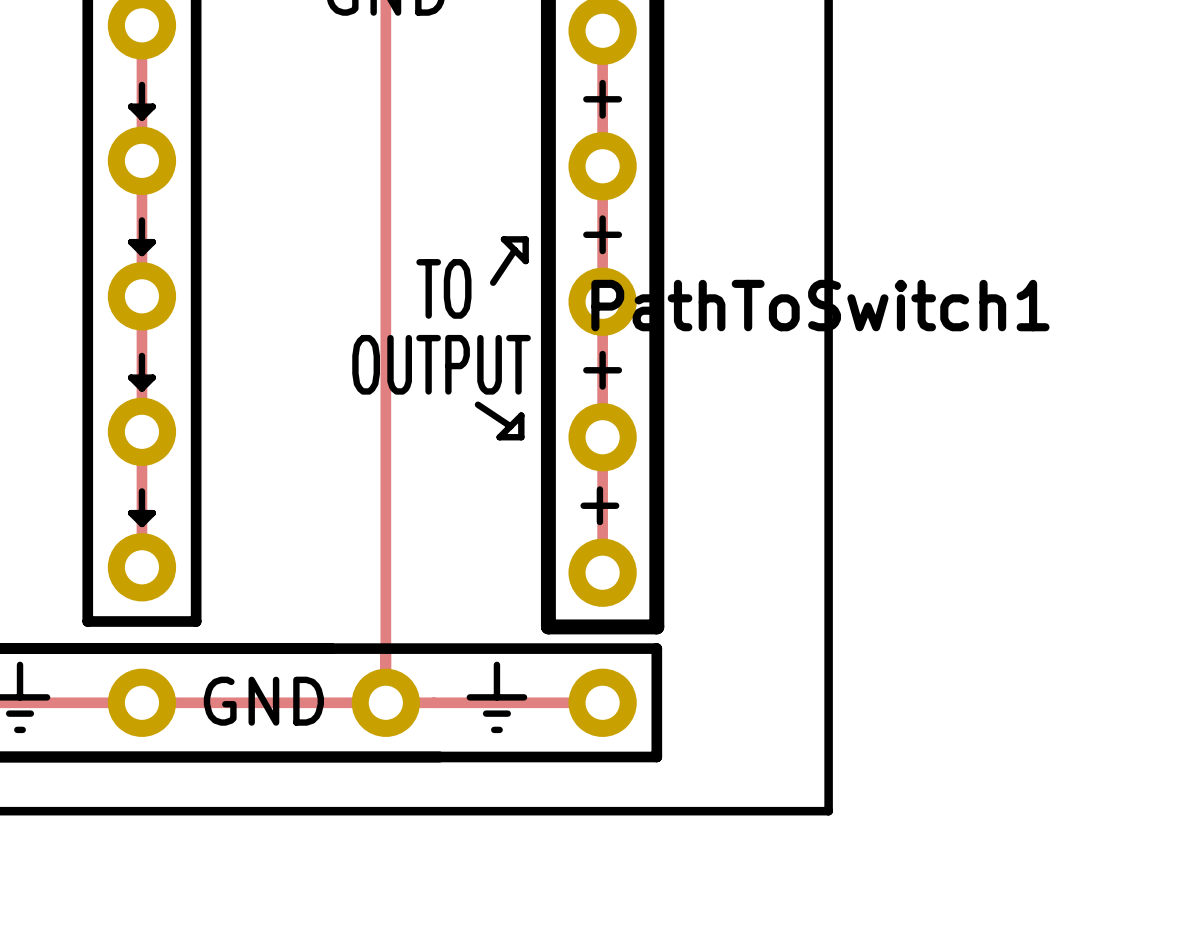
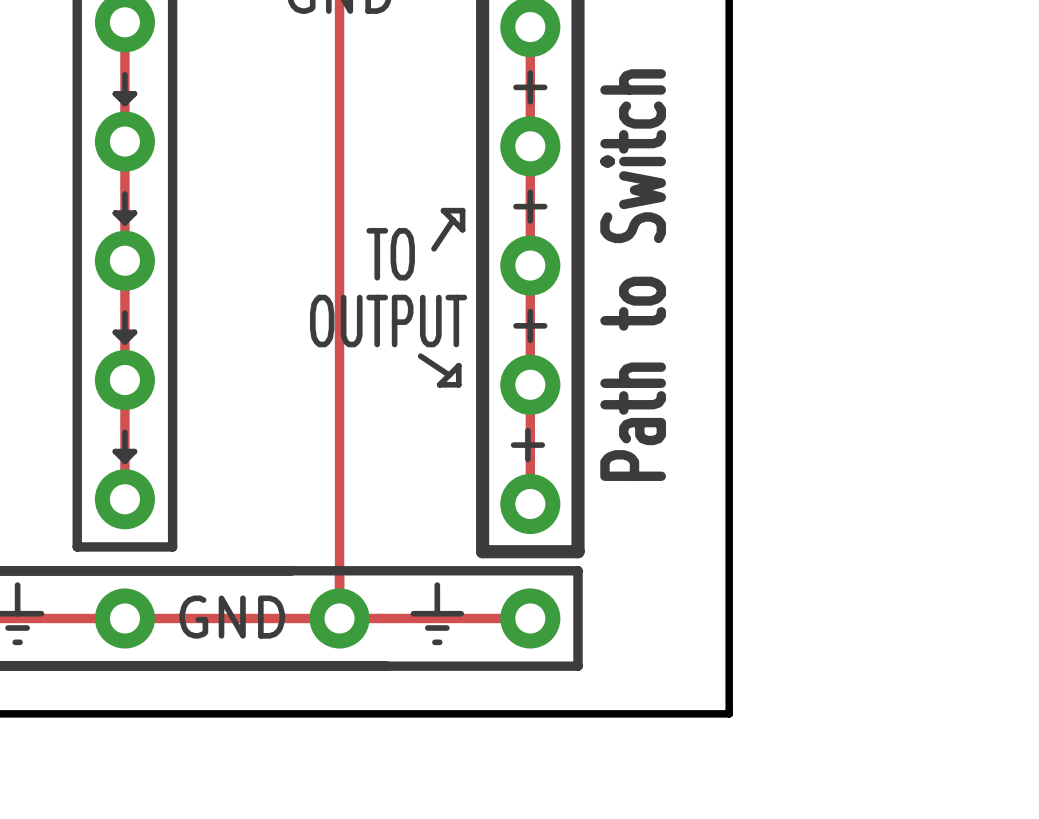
PathToSwitch1 name: PathToSwitch1 (820, 305) -> none
PathToSwitch1 value: none -> Path to Switch (633, 275)

